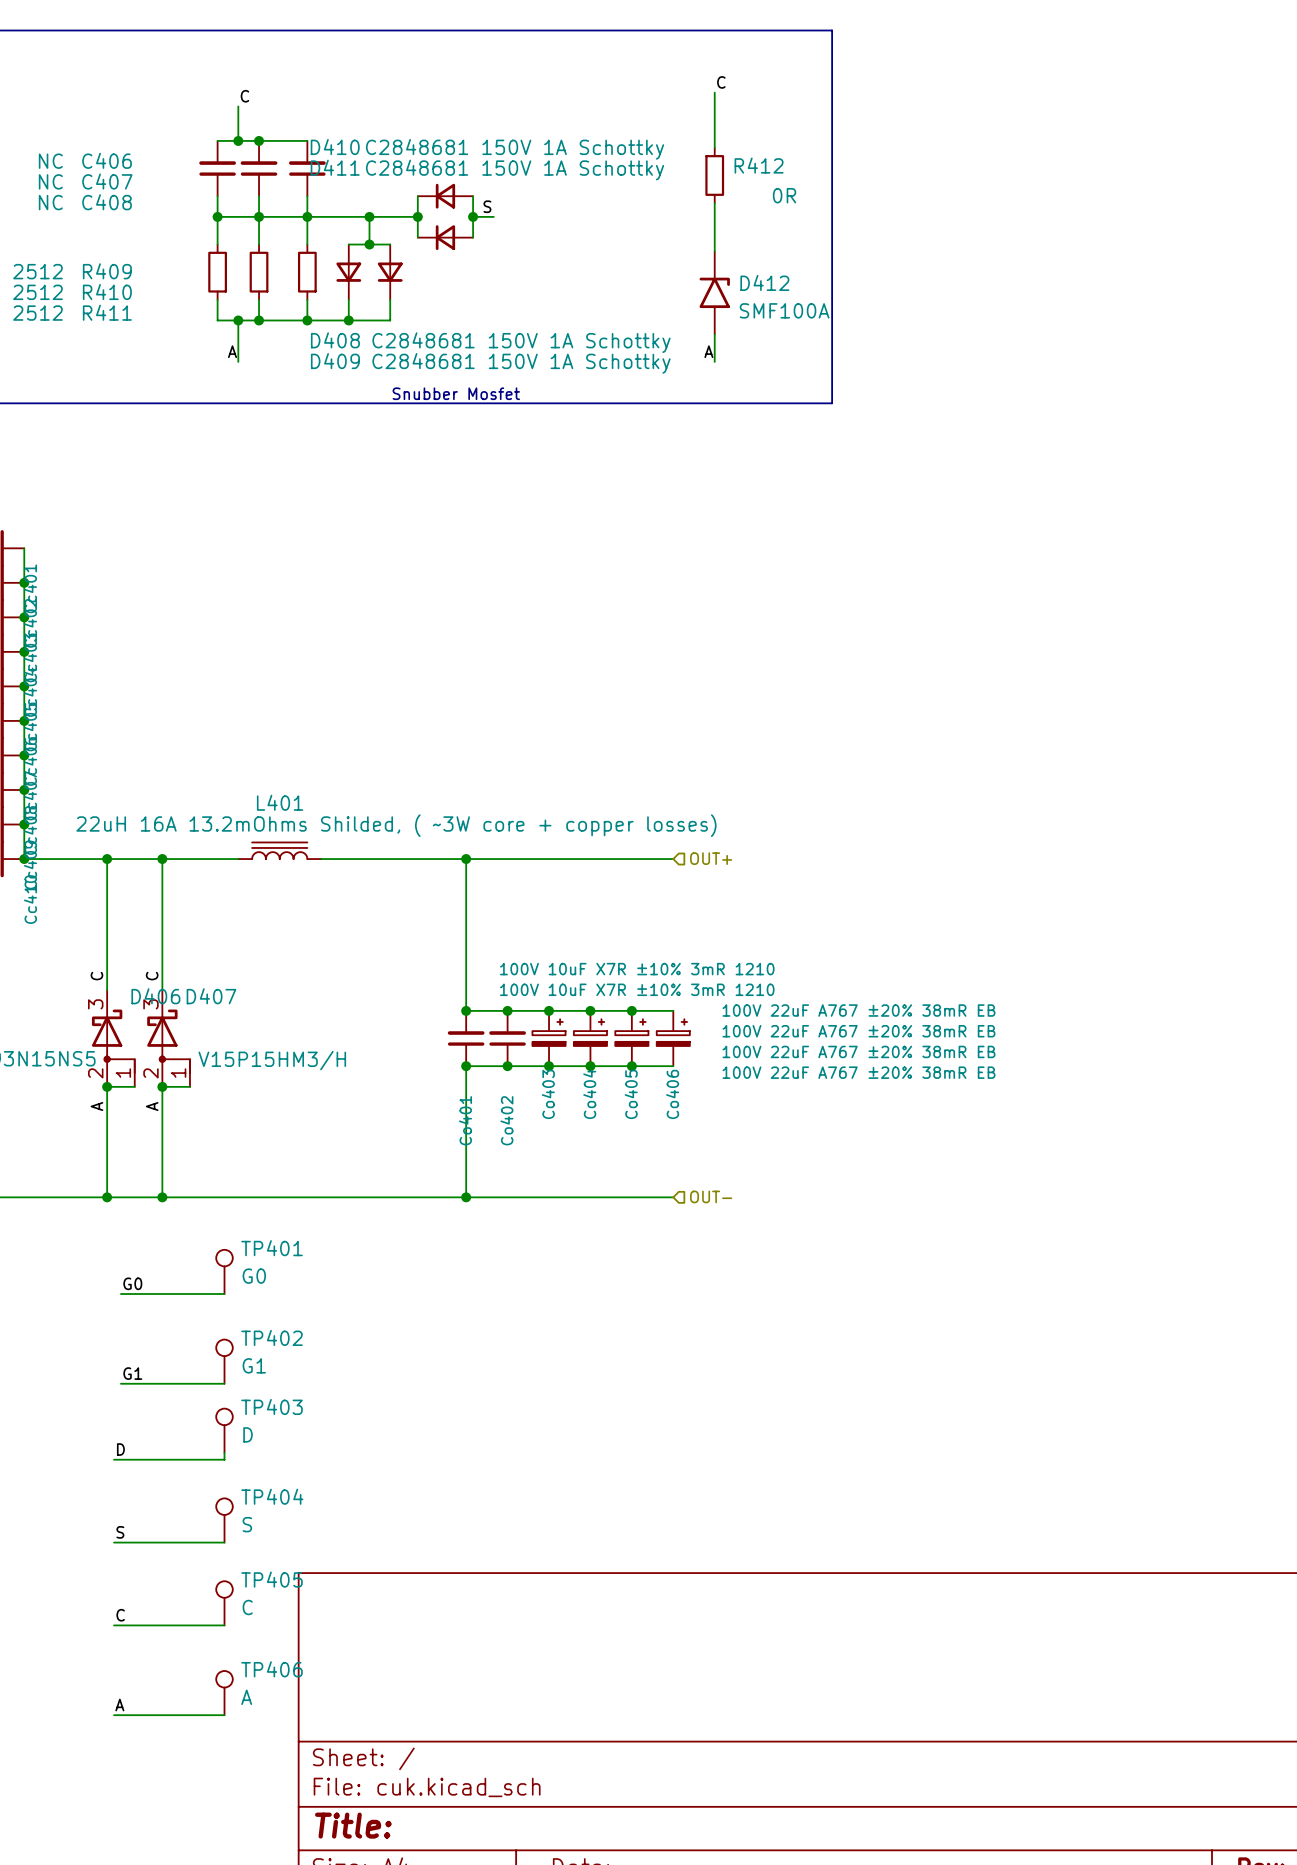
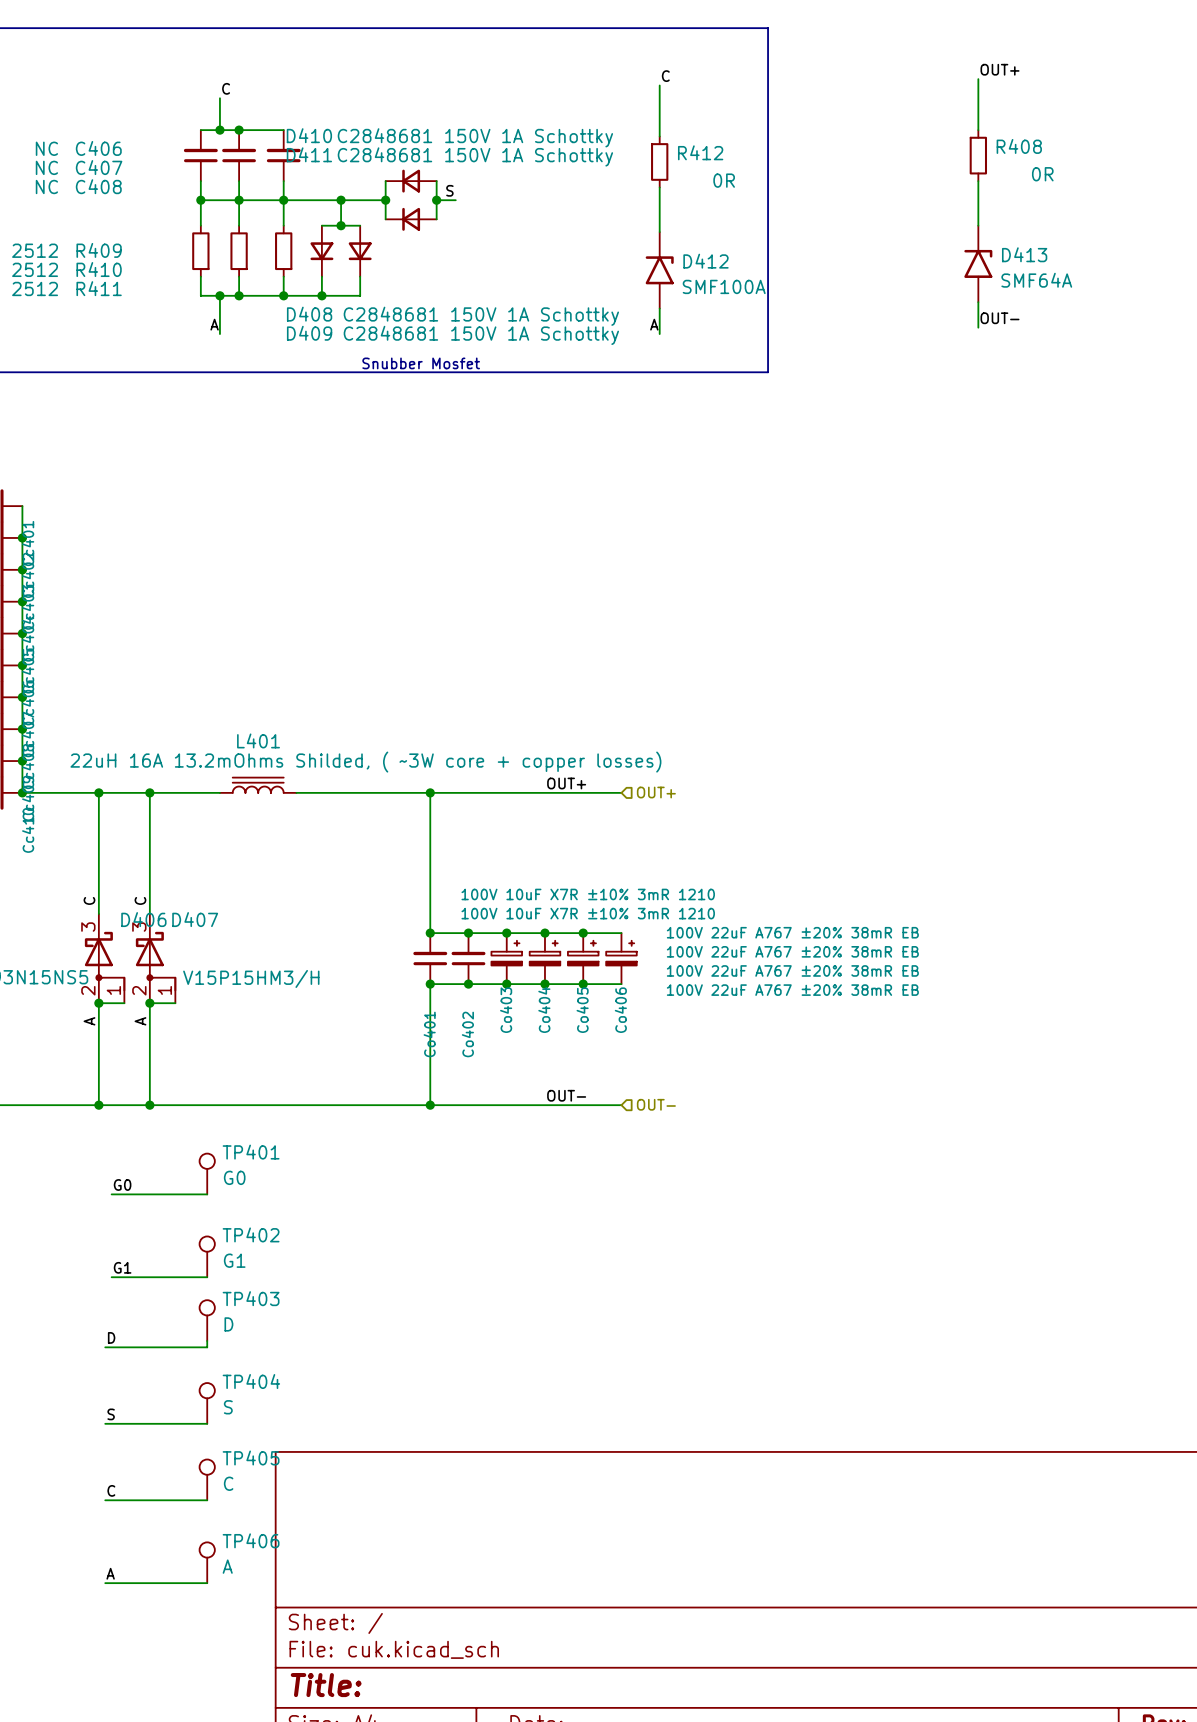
label: none -> OUT+ (999, 69)
wire: none -> (978, 79) (978, 130)
R408: none -> 0R (978, 155)
wire: none -> (978, 181) (978, 225)
D413: none -> SMF64A (978, 263)
wire: none -> (978, 302) (978, 327)
label: none -> OUT- (999, 318)
label: none -> OUT+ (566, 783)
label: none -> OUT- (566, 1095)

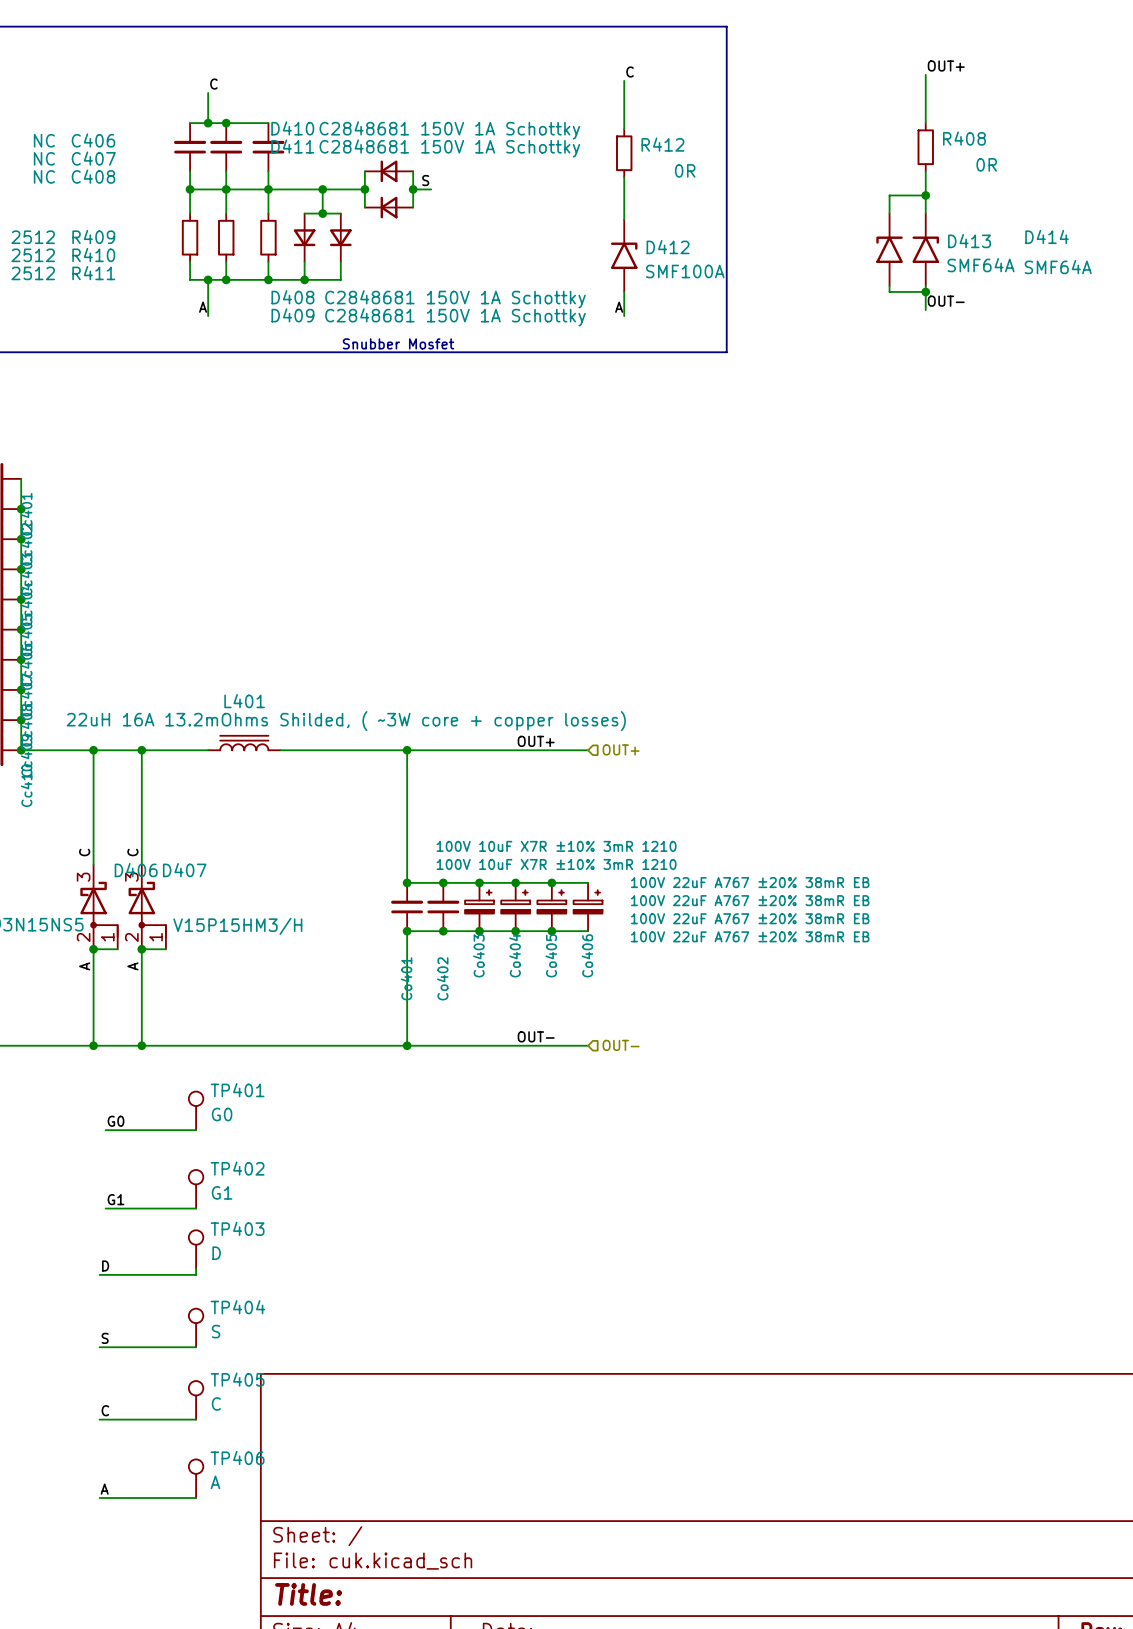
wire: none -> (925, 195) (889, 195) (889, 213)
junction: none -> (925, 195)
D414: none -> SMF64A (889, 249)
wire: none -> (889, 285) (889, 291) (925, 291)
junction: none -> (925, 291)

